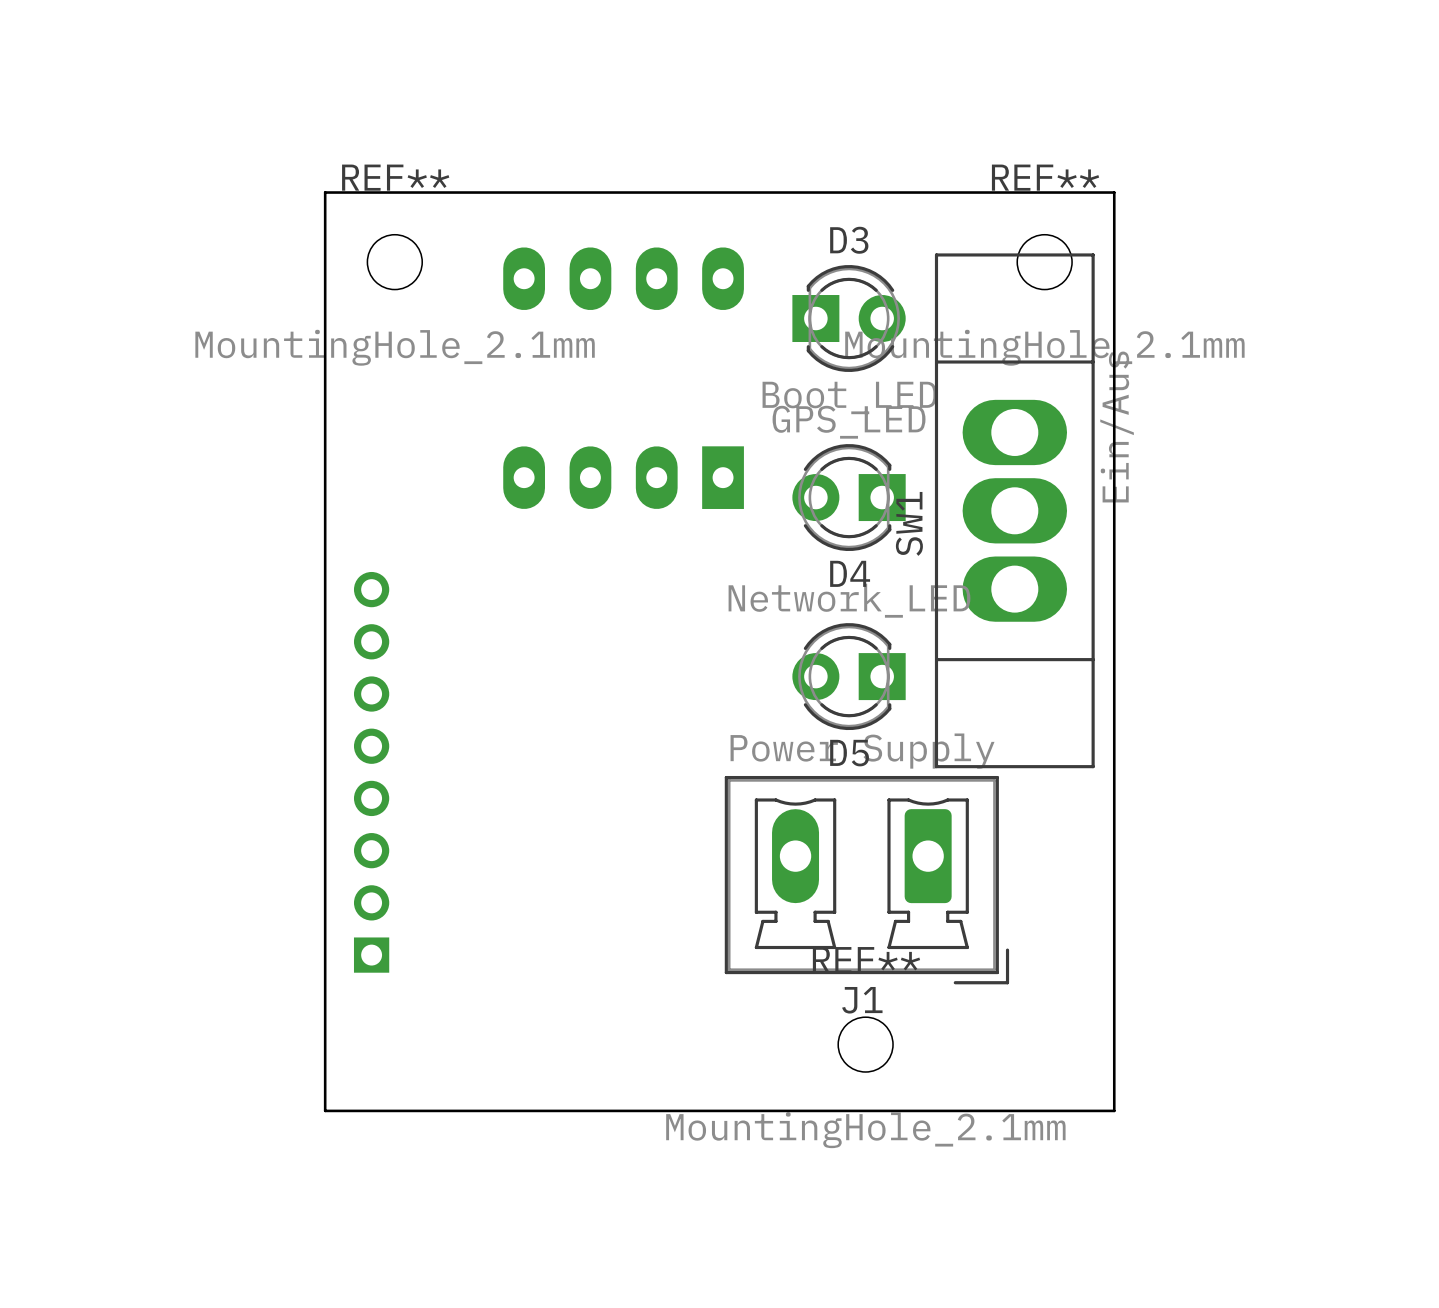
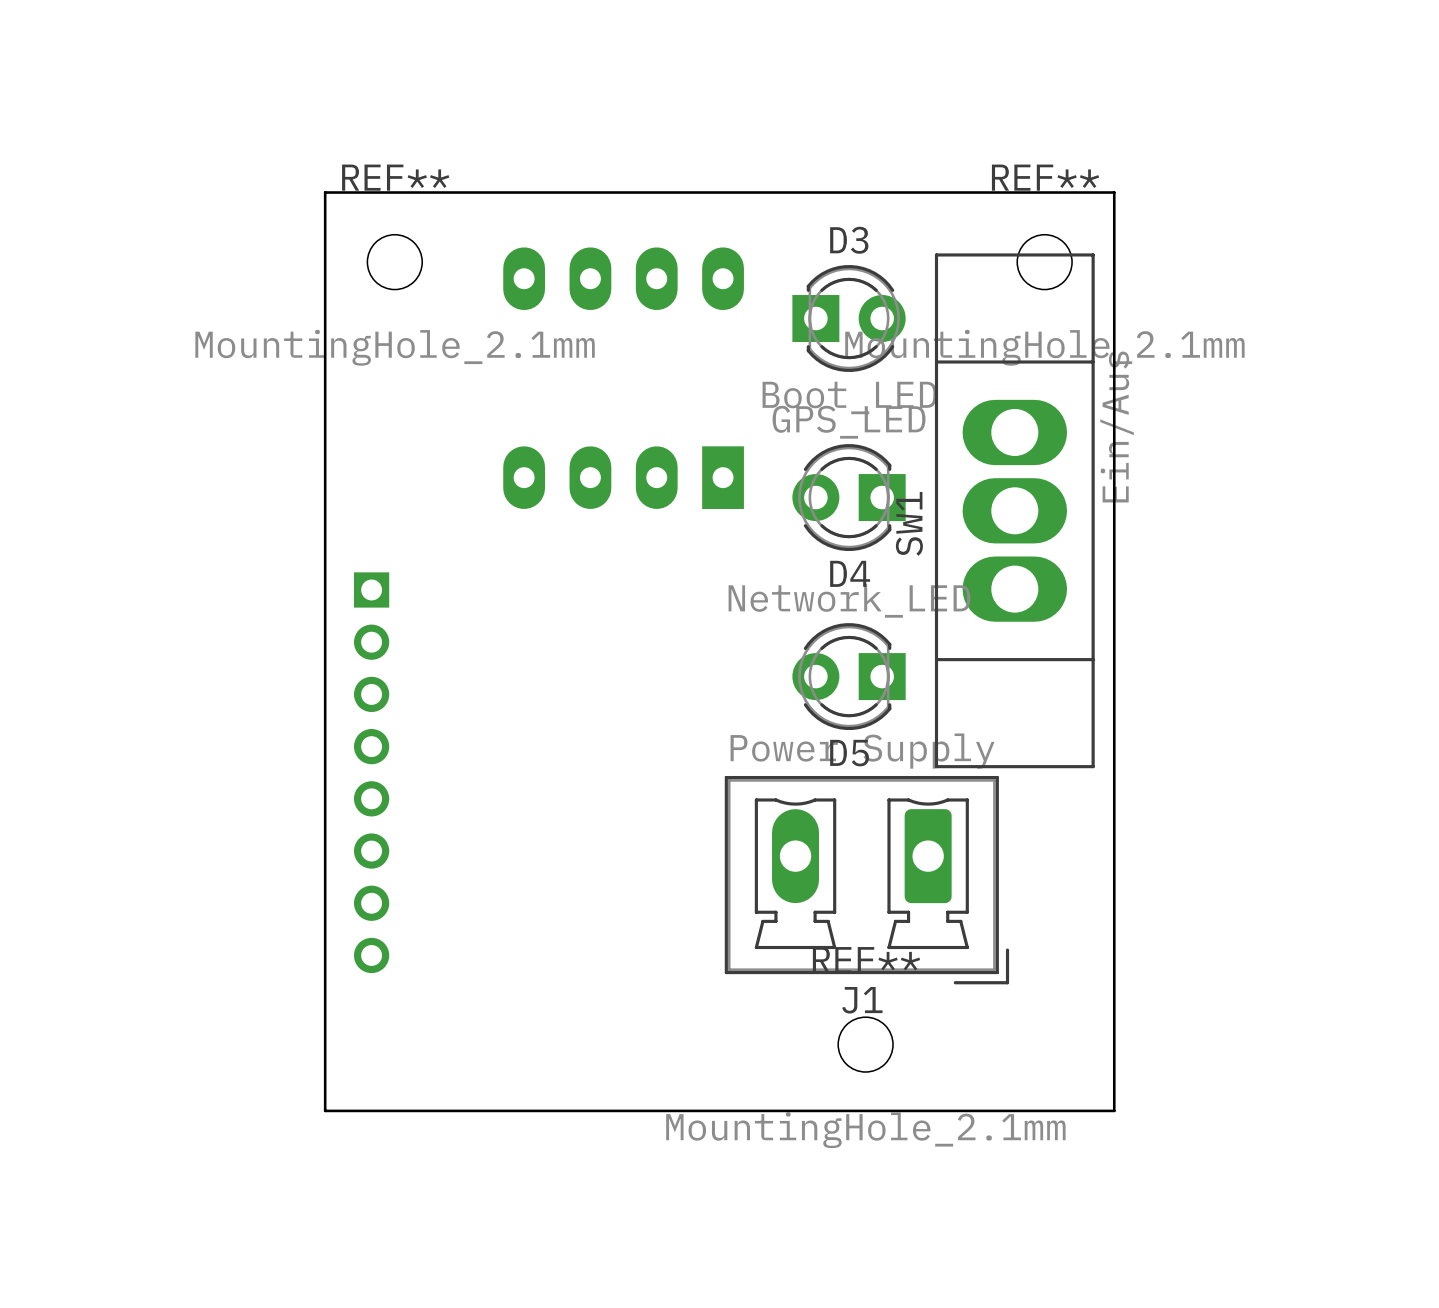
part rotation: 0° (371, 772) -> 180° (371, 772)

